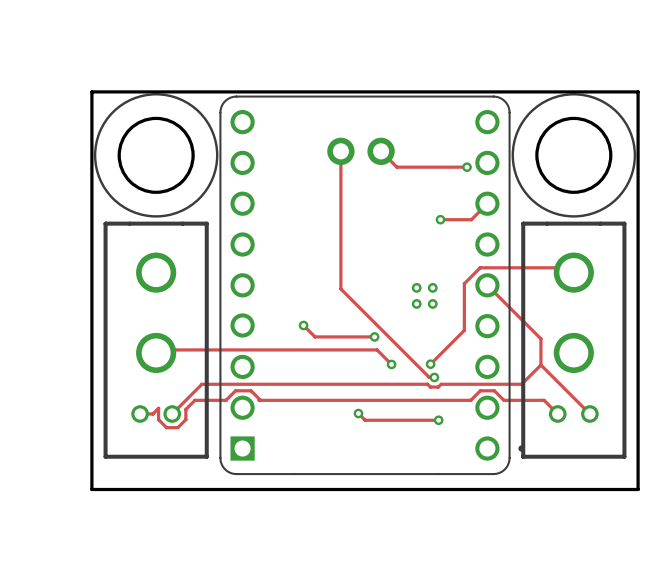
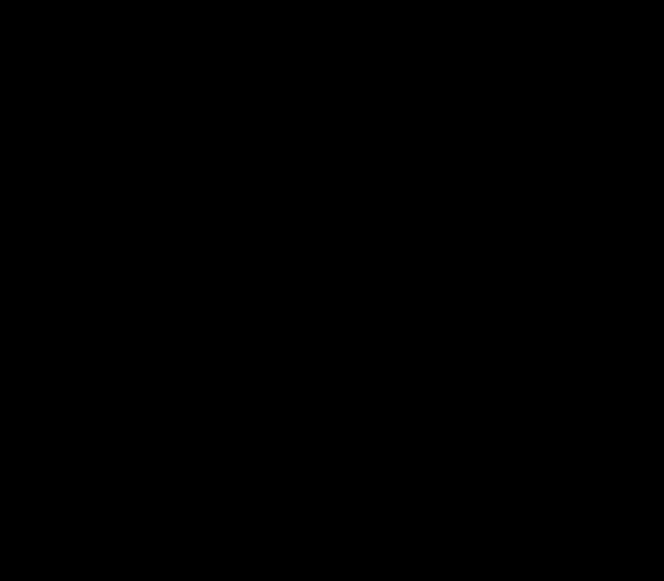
board edge: (91, 91) (638, 91) (638, 489) (91, 489) (91, 91) -> none
drawing: [93, 93, 219, 218] -> none
drawing: [511, 93, 637, 218] -> none
round board edge: [117, 116, 195, 194] -> none
round board edge: [535, 116, 613, 194] -> none
track: (340, 151) (340, 289) (429, 377) (434, 377) -> none
part: (360, 151) -> none
track: (381, 151) (396, 167) (467, 167) -> none
via: (467, 167) -> none
track: (487, 203) (471, 219) (440, 219) -> none
via: (440, 219) -> none
track: (573, 272) (569, 267) (480, 267) (464, 283) (464, 330) (430, 364) -> none
part: (372, 285) -> none
track: (487, 285) (540, 338) (540, 365) -> none
part: (424, 295) -> none
track: (303, 325) (315, 336) (374, 336) -> none
via: (303, 325) -> none
via: (374, 336) -> none
part: (156, 340) -> none
part: (573, 340) -> none
track: (156, 352) (159, 349) (377, 349) (391, 364) -> none
via: (391, 364) -> none
via: (430, 364) -> none
track: (540, 365) (589, 413) -> none
track: (540, 365) (521, 384) (441, 384) (438, 387) (430, 387) (427, 384) (201, 384) (172, 413) -> none
via: (434, 377) -> none
track: (226, 400) (194, 400) (185, 409) (185, 419) (177, 427) (166, 427) (158, 419) (158, 408) (152, 413) (140, 413) -> none
track: (259, 400) (470, 400) (480, 390) (494, 390) (503, 400) (544, 400) (557, 413) -> none
track: (260, 400) (251, 390) (235, 390) (225, 400) -> none
track: (358, 413) (365, 420) (438, 420) -> none
via: (358, 413) -> none
via: (438, 420) -> none

